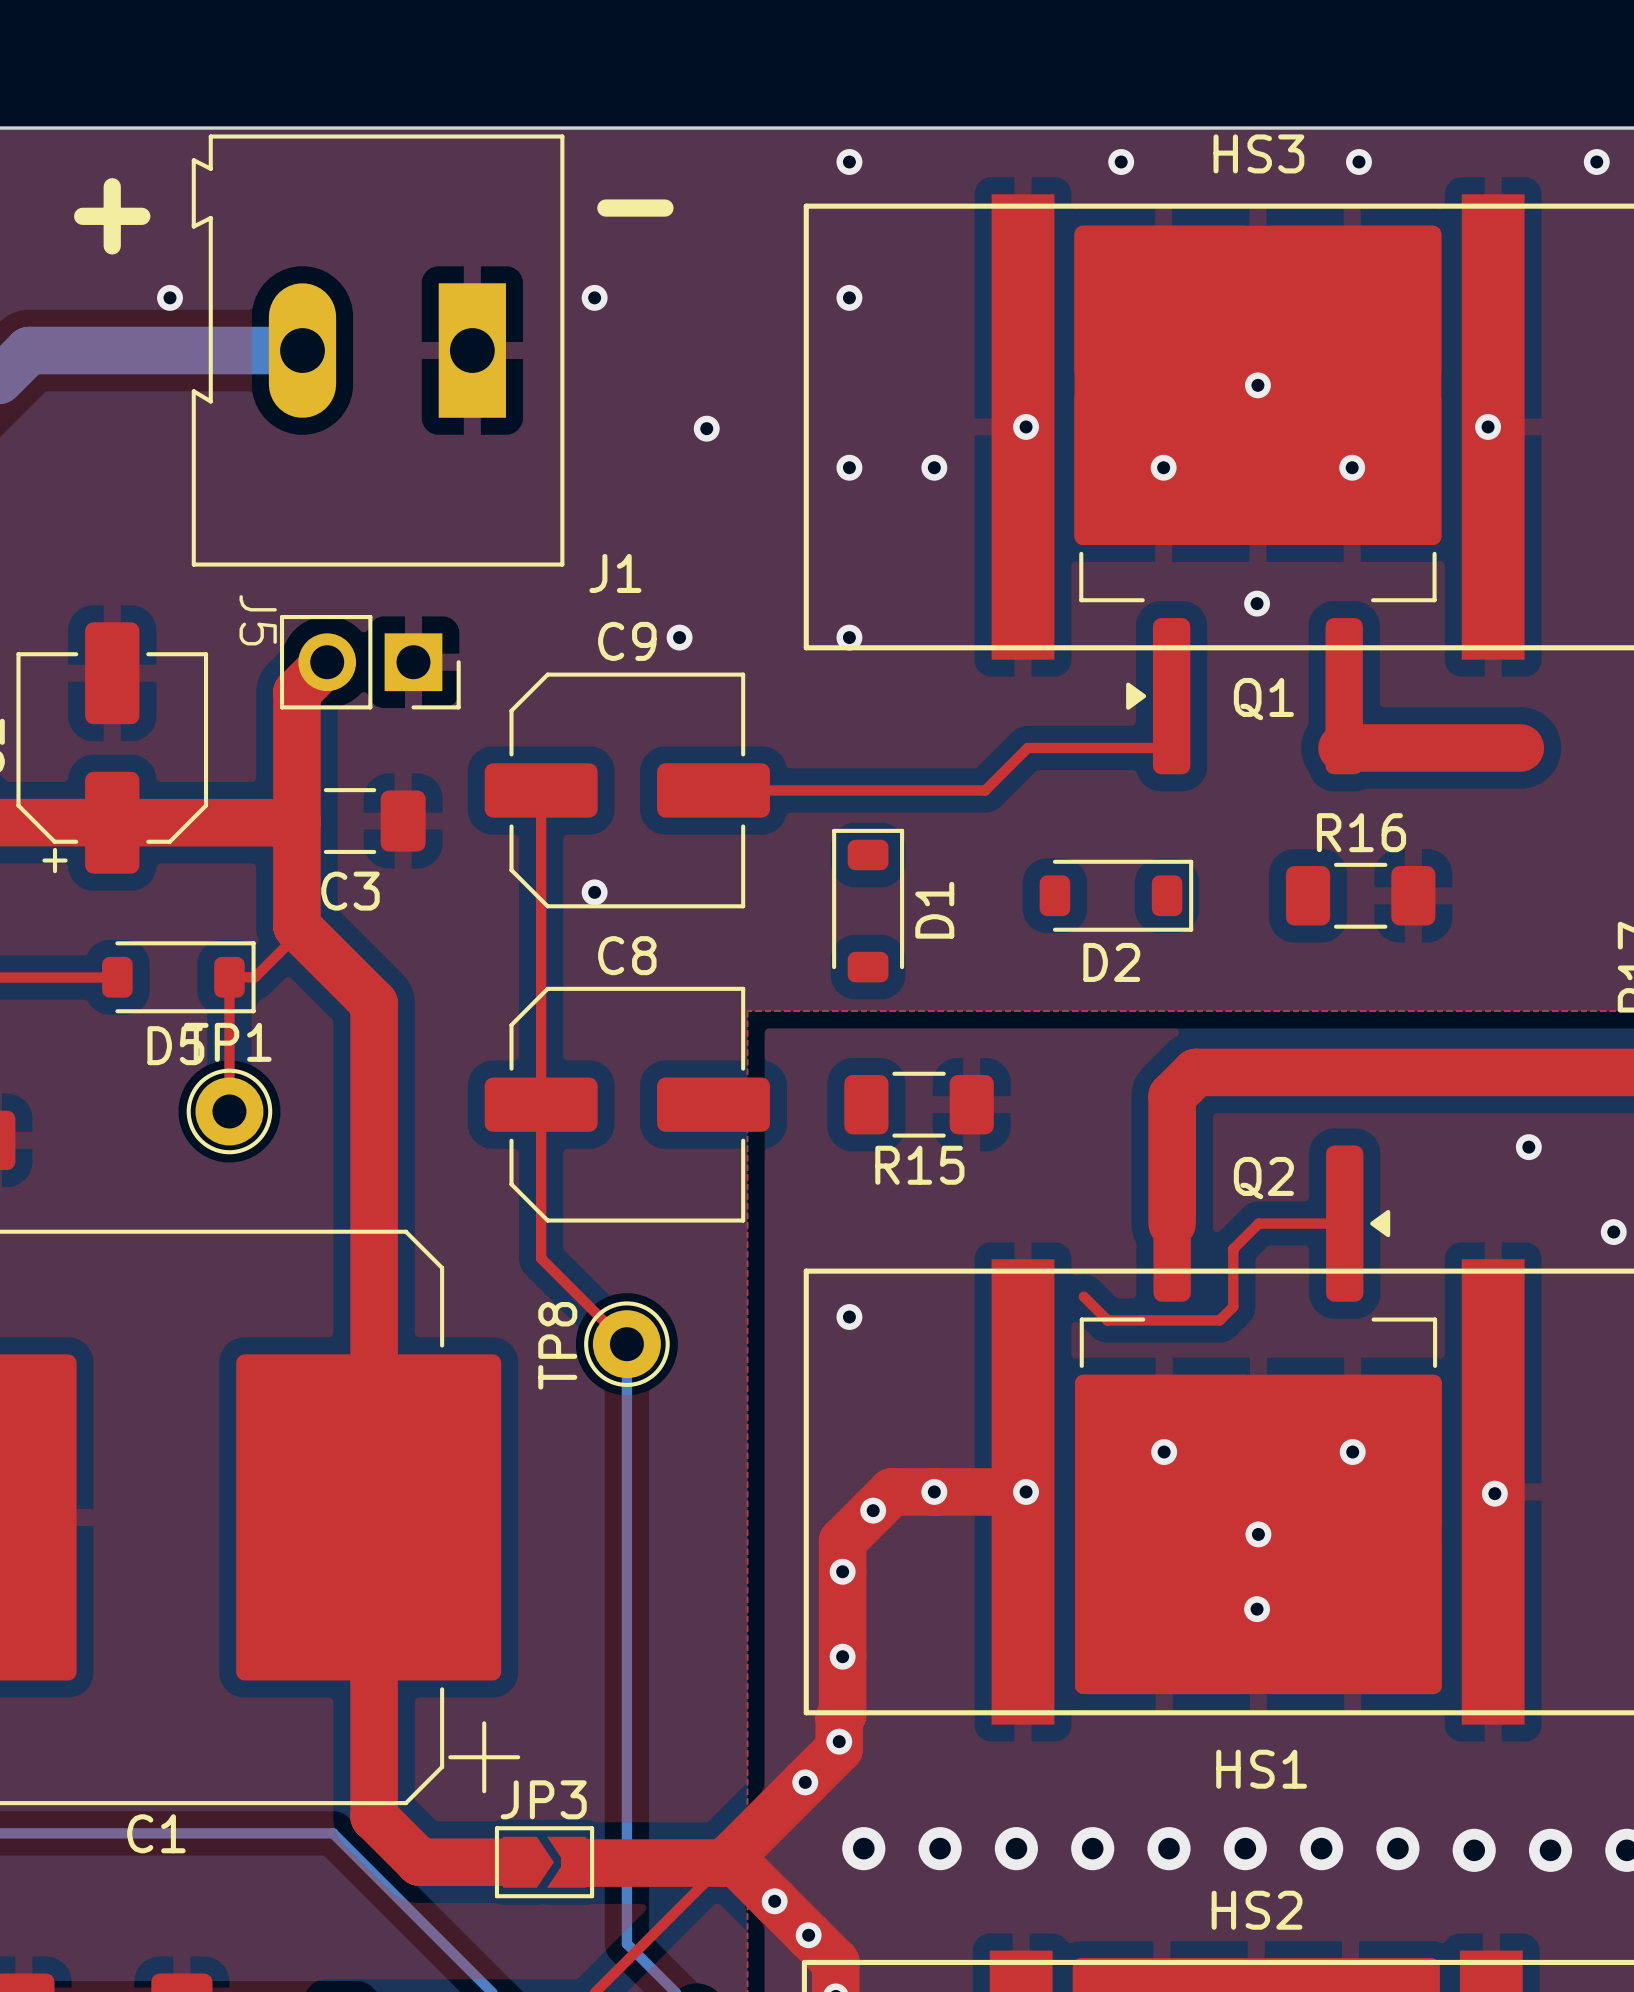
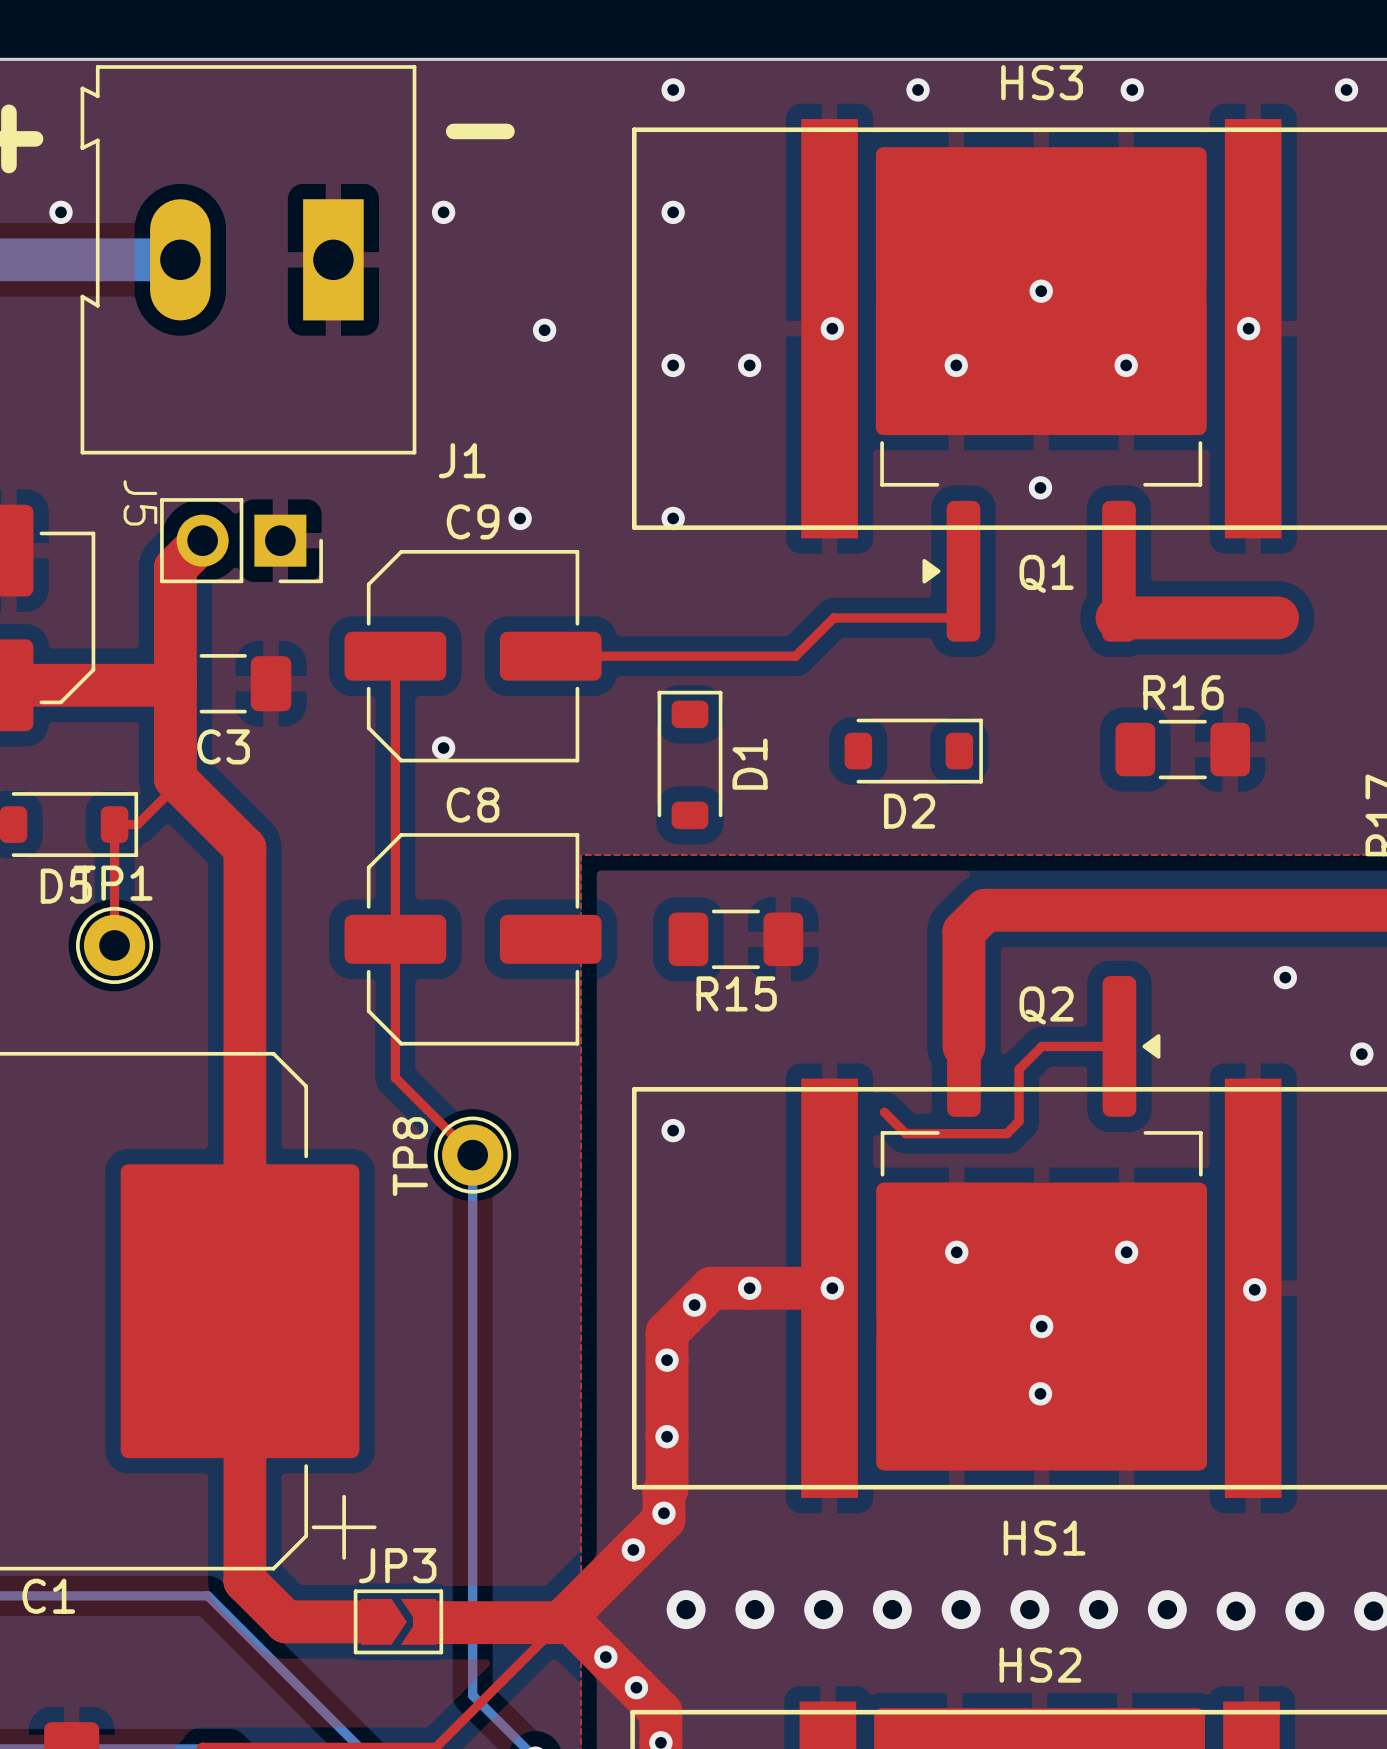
R16 position: (1360, 895) -> (1182, 749)

